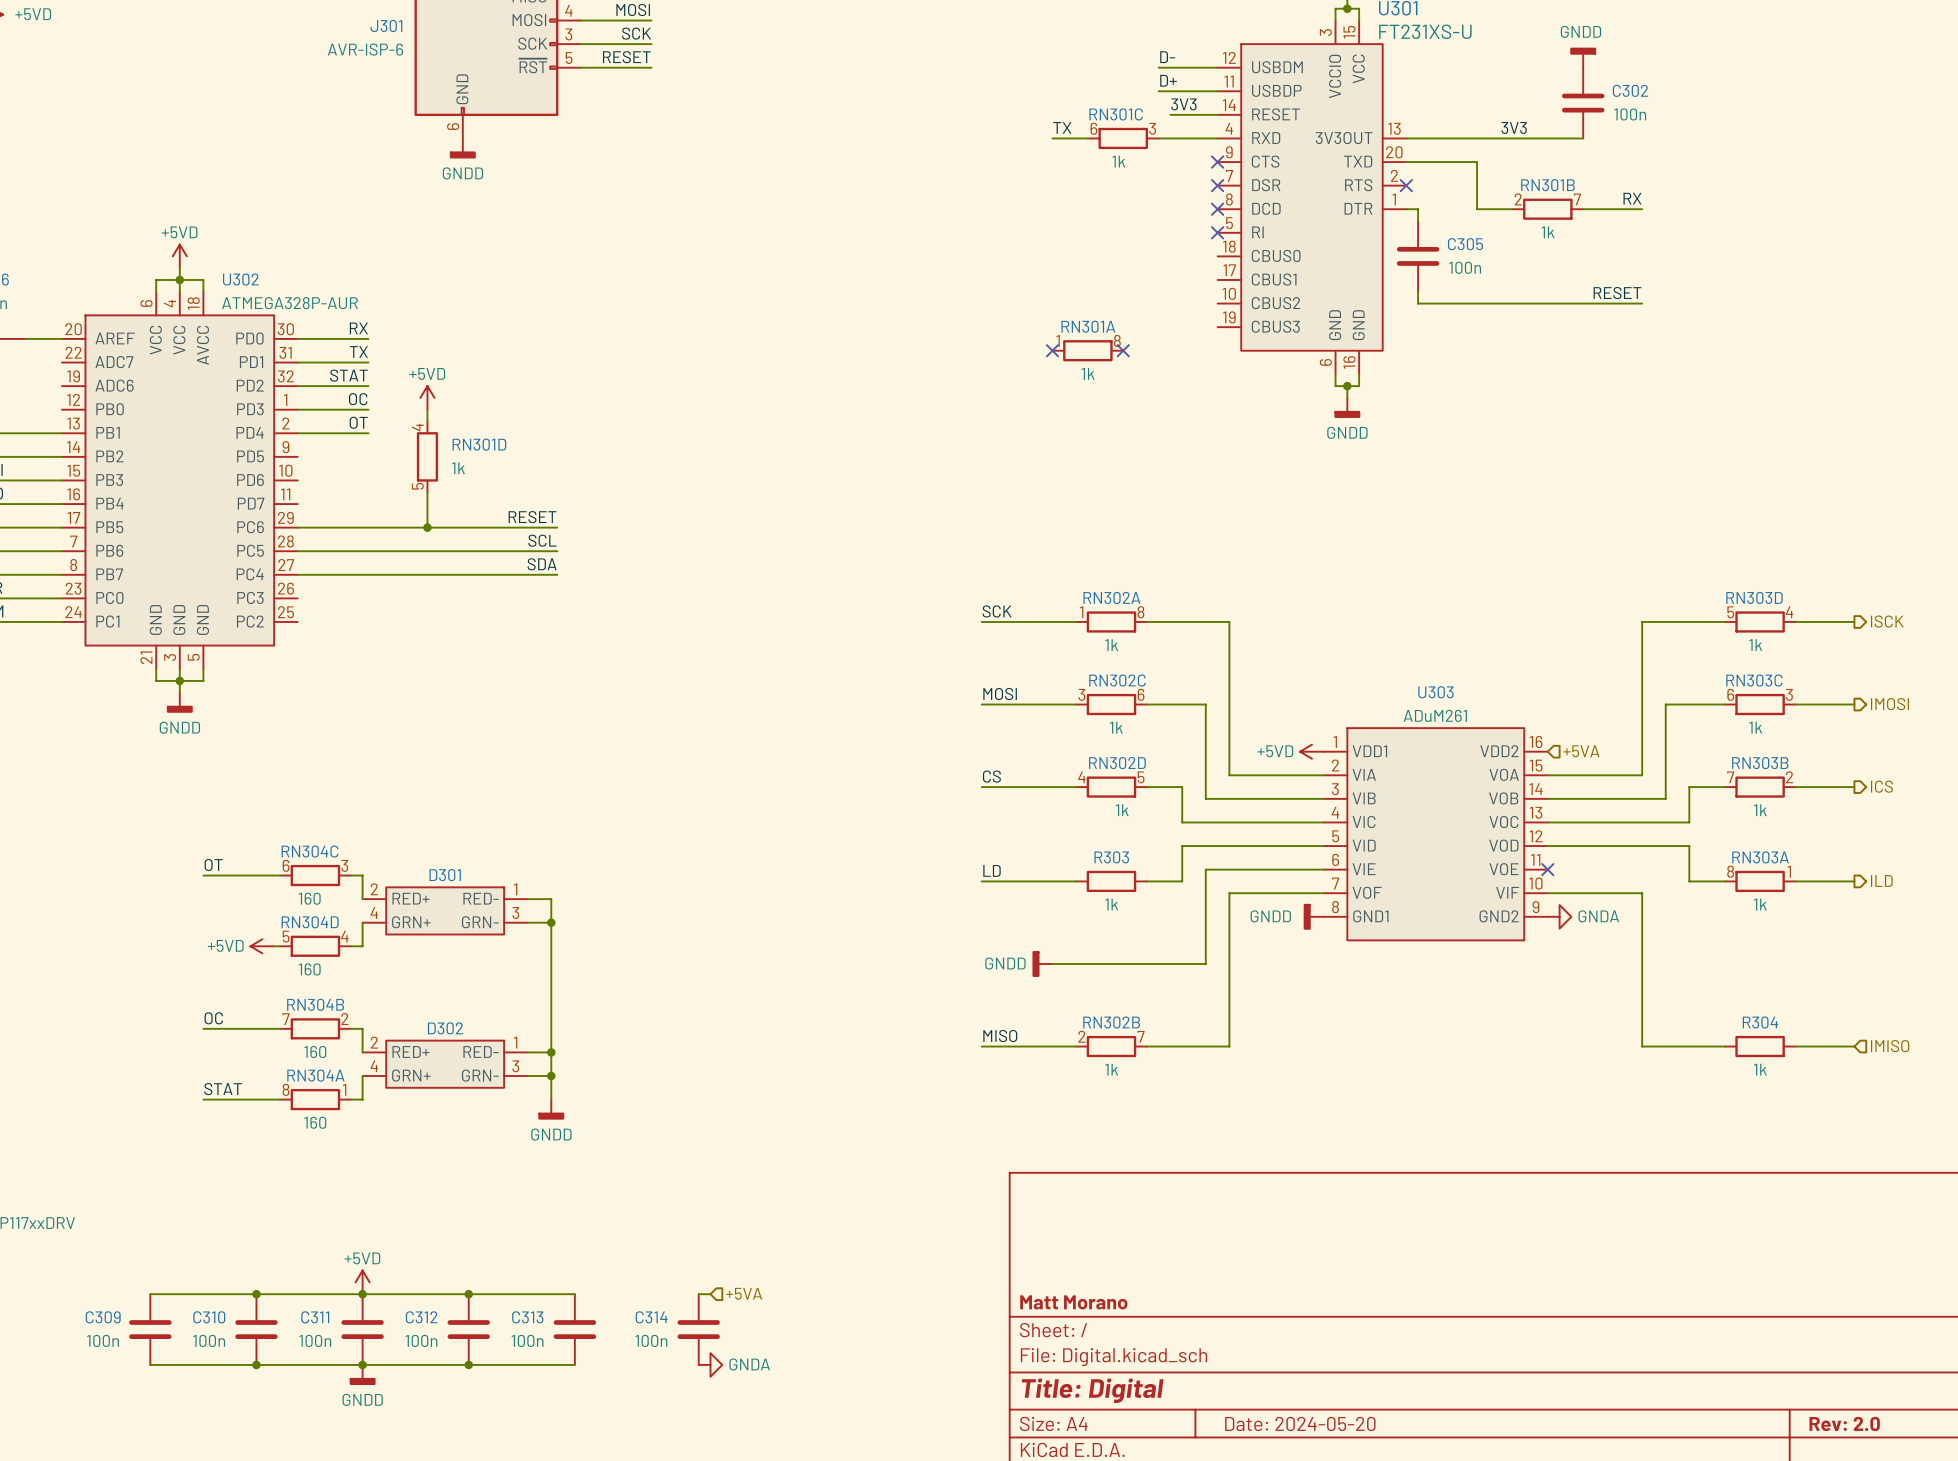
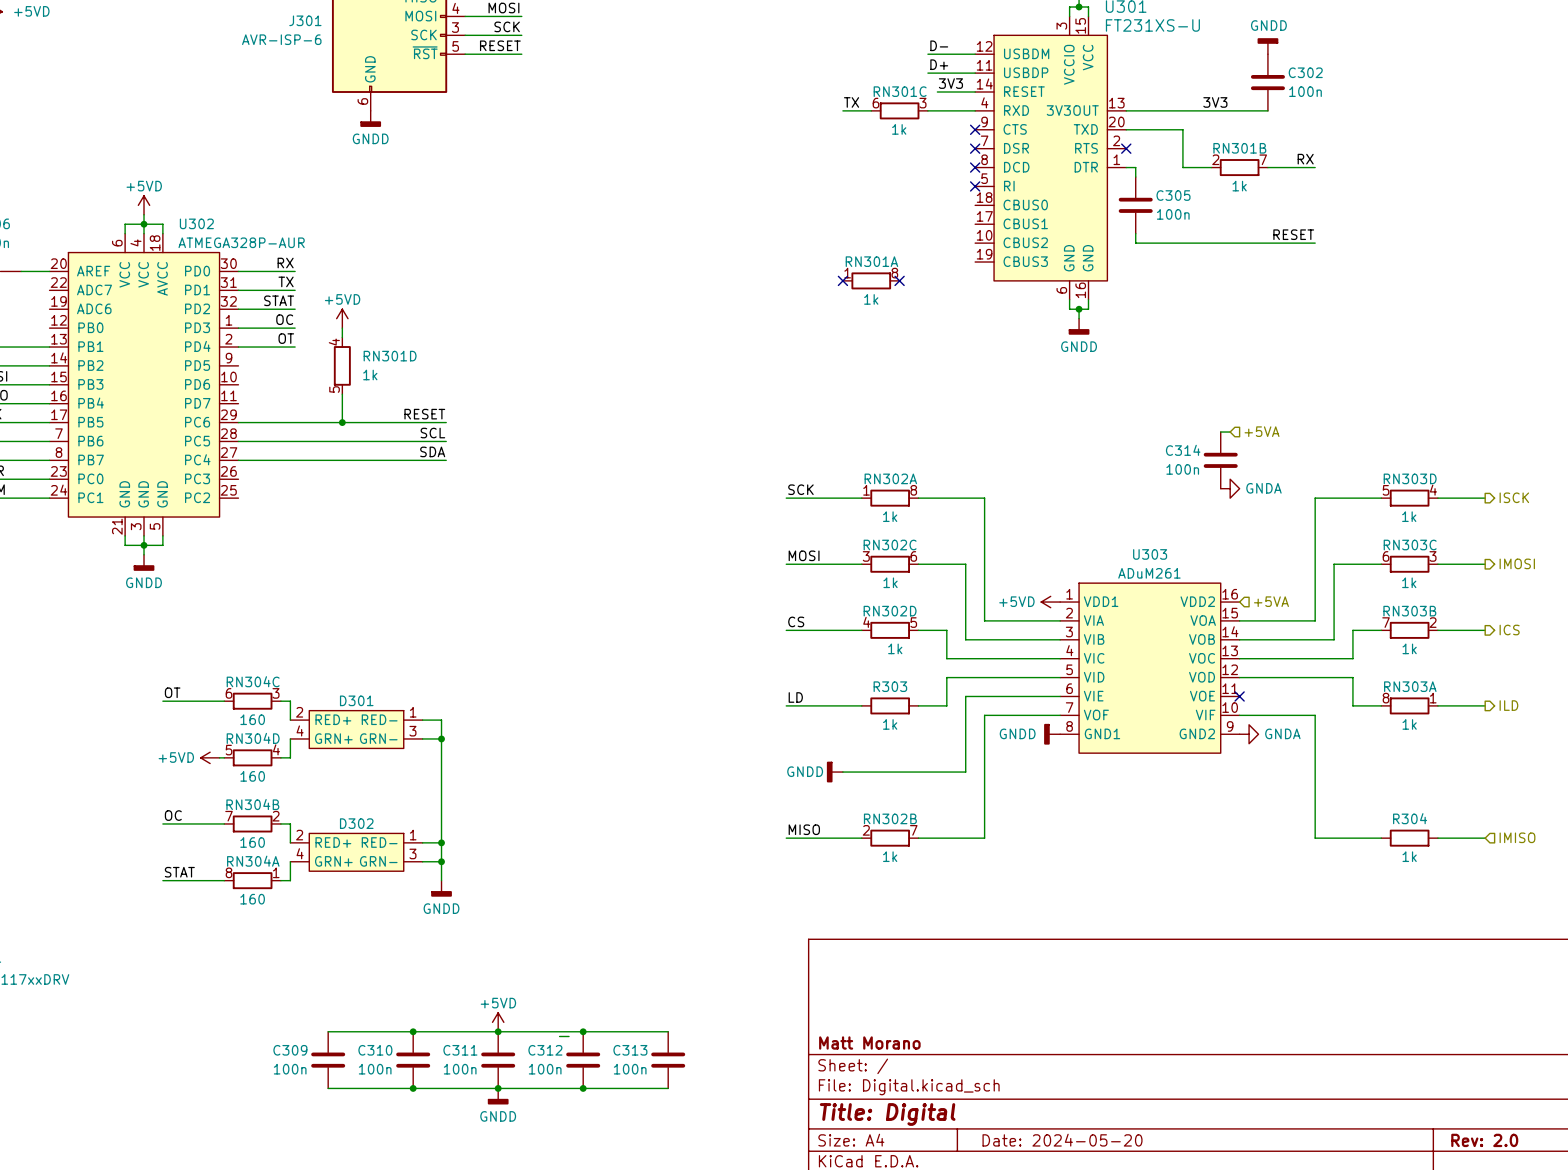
wire: none -> (1220, 432) (1230, 432)
hierarchical label: none -> +5VA (1262, 431)
power symbol: none -> GNDA (1230, 488)
power symbol: none -> +5VD (498, 1022)
power symbol: +5VD (362, 1282) -> none
wire: none -> (328, 1031) (668, 1031)
junction: none -> (413, 1031)
junction: none -> (498, 1031)
junction: none -> (583, 1031)
hierarchical label: +5VA (744, 1293) -> none
wire: (150, 1294) (574, 1294) -> none
junction: (256, 1294) -> none
junction: (362, 1294) -> none
junction: (468, 1294) -> none
C309 position: (150, 1329) -> (328, 1060)
C310 position: (256, 1329) -> (413, 1060)
C311 position: (362, 1329) -> (498, 1060)
C312 position: (468, 1329) -> (583, 1060)
C313 position: (574, 1329) -> (668, 1060)
C314 position: (698, 1329) -> (1220, 460)
wire: none -> (328, 1088) (668, 1088)
junction: none -> (413, 1088)
junction: none -> (498, 1088)
junction: none -> (583, 1088)
wire: (150, 1364) (574, 1364) -> none
junction: (256, 1364) -> none
junction: (362, 1364) -> none
junction: (468, 1364) -> none
power symbol: GNDA (710, 1364) -> none
power symbol: none -> GNDD (498, 1096)
power symbol: GNDD (362, 1374) -> none

